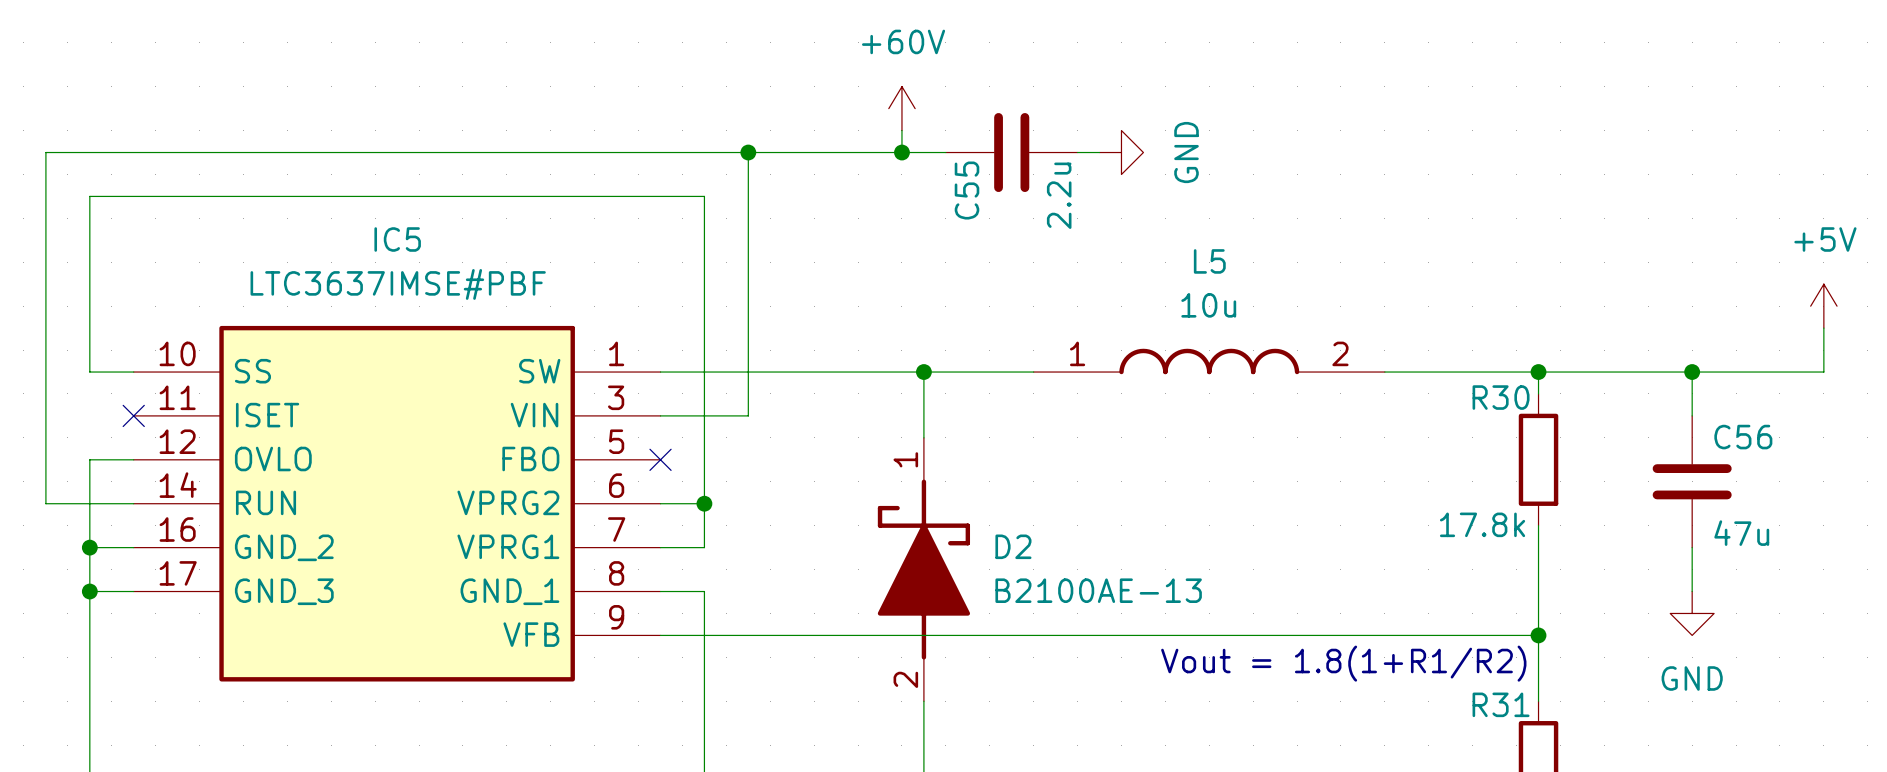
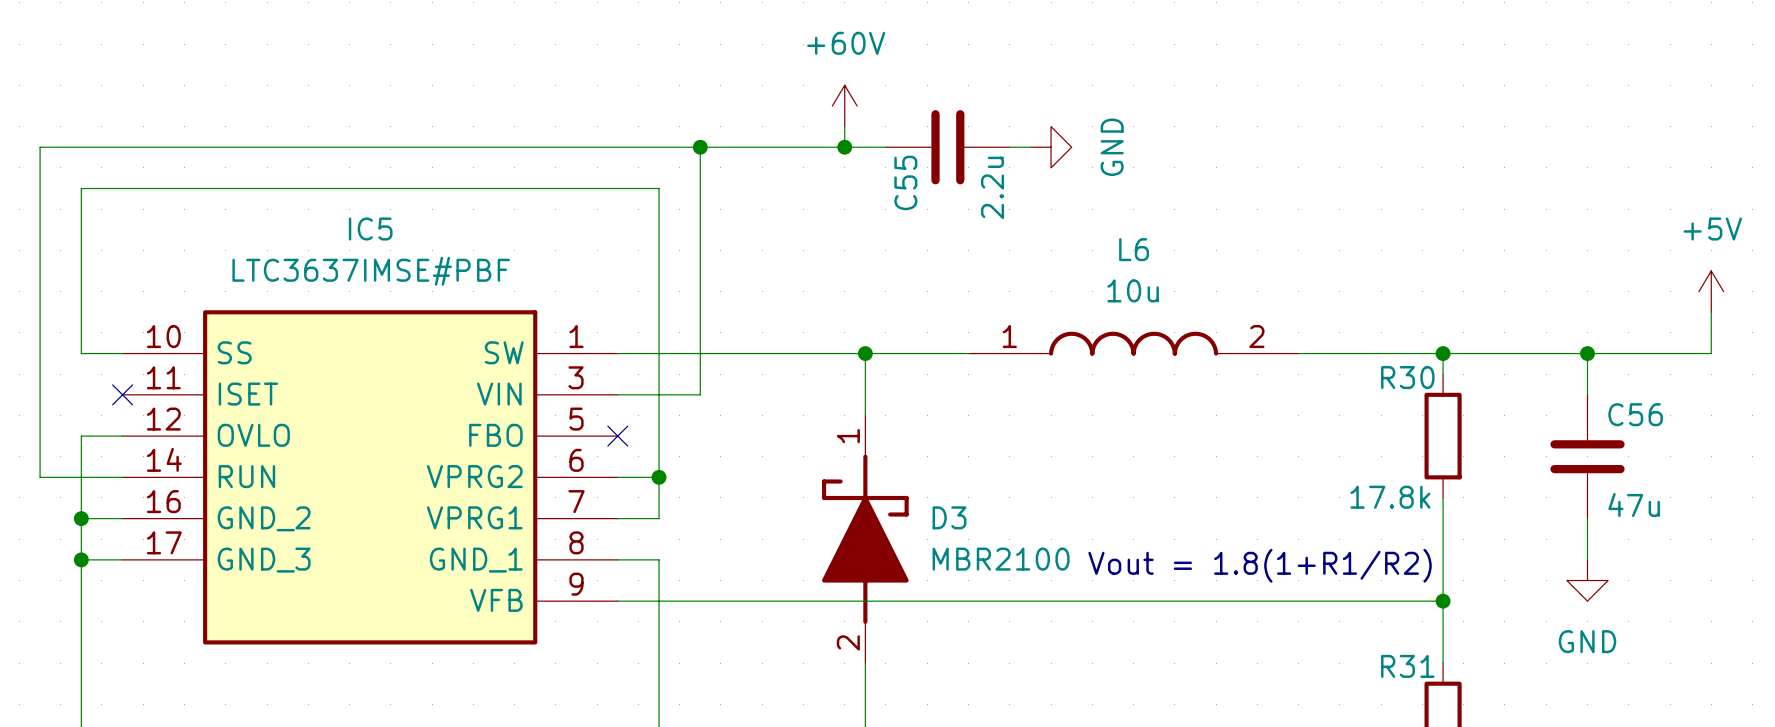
L5 name: L5 (1209, 261) -> L6 (1134, 249)
D2 name: D2 (1013, 546) -> D3 (949, 517)
D2 value: B2100AE-13 (1098, 590) -> MBR2100 (1001, 559)
text position: Vout = 1.8(1+R1/R2) (1343, 663) -> Vout = 1.8(1+R1/R2) (1260, 565)

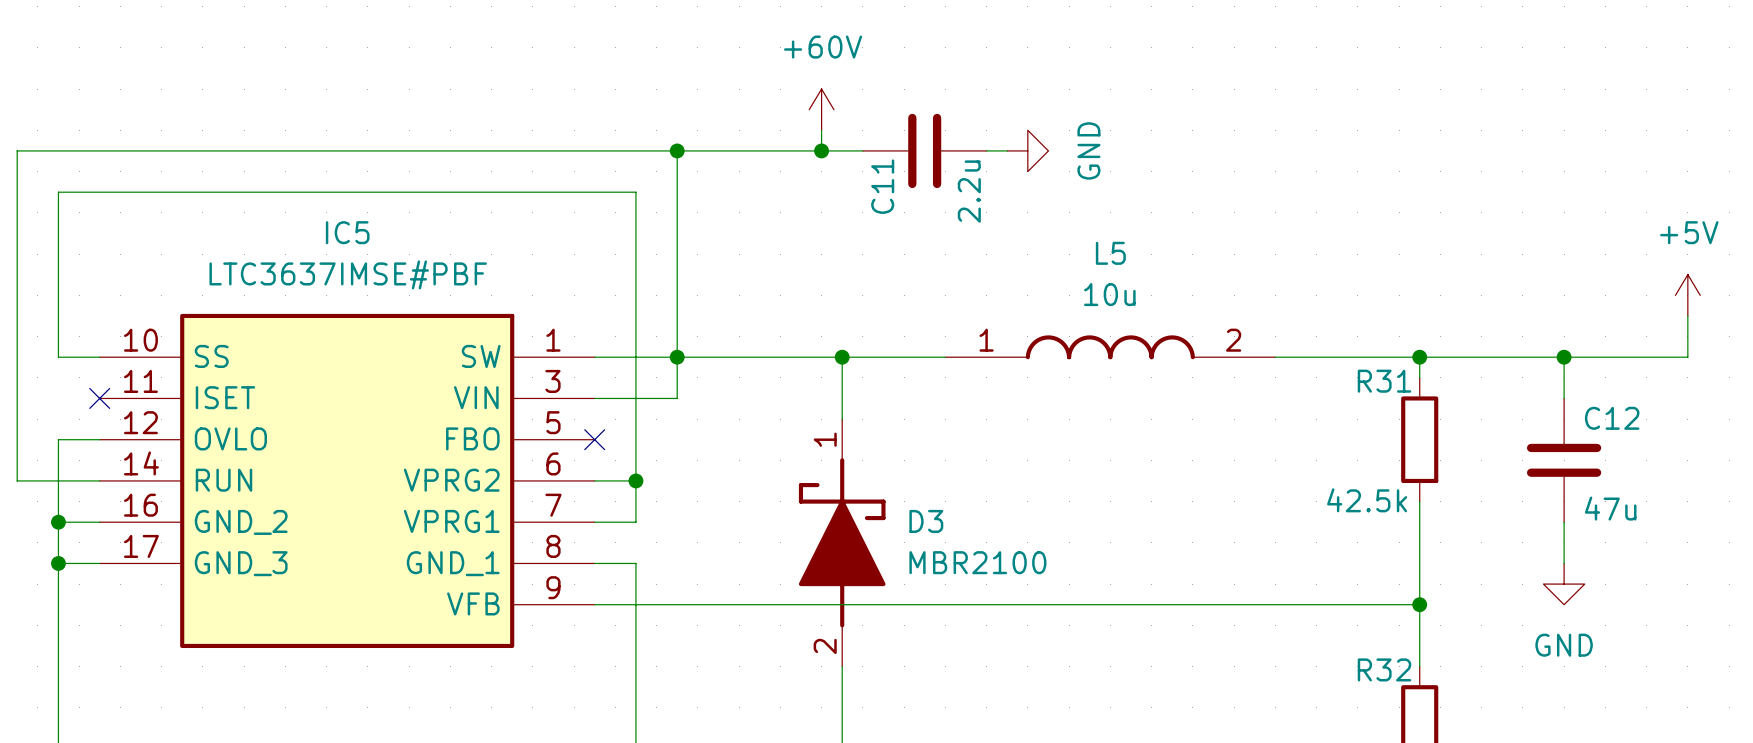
C55 name: C55 (905, 182) -> C11 (882, 186)
L6 name: L6 (1134, 249) -> L5 (1110, 253)
junction: none -> (677, 357)
R30 name: R30 (1407, 377) -> R31 (1384, 381)
C56 name: C56 (1635, 414) -> C12 (1612, 418)
R30 value: 17.8k (1390, 497) -> 42.5k (1367, 500)
text: Vout = 1.8(1+R1/R2) (1260, 565) -> none
R31 name: R31 (1407, 666) -> R32 (1384, 669)

